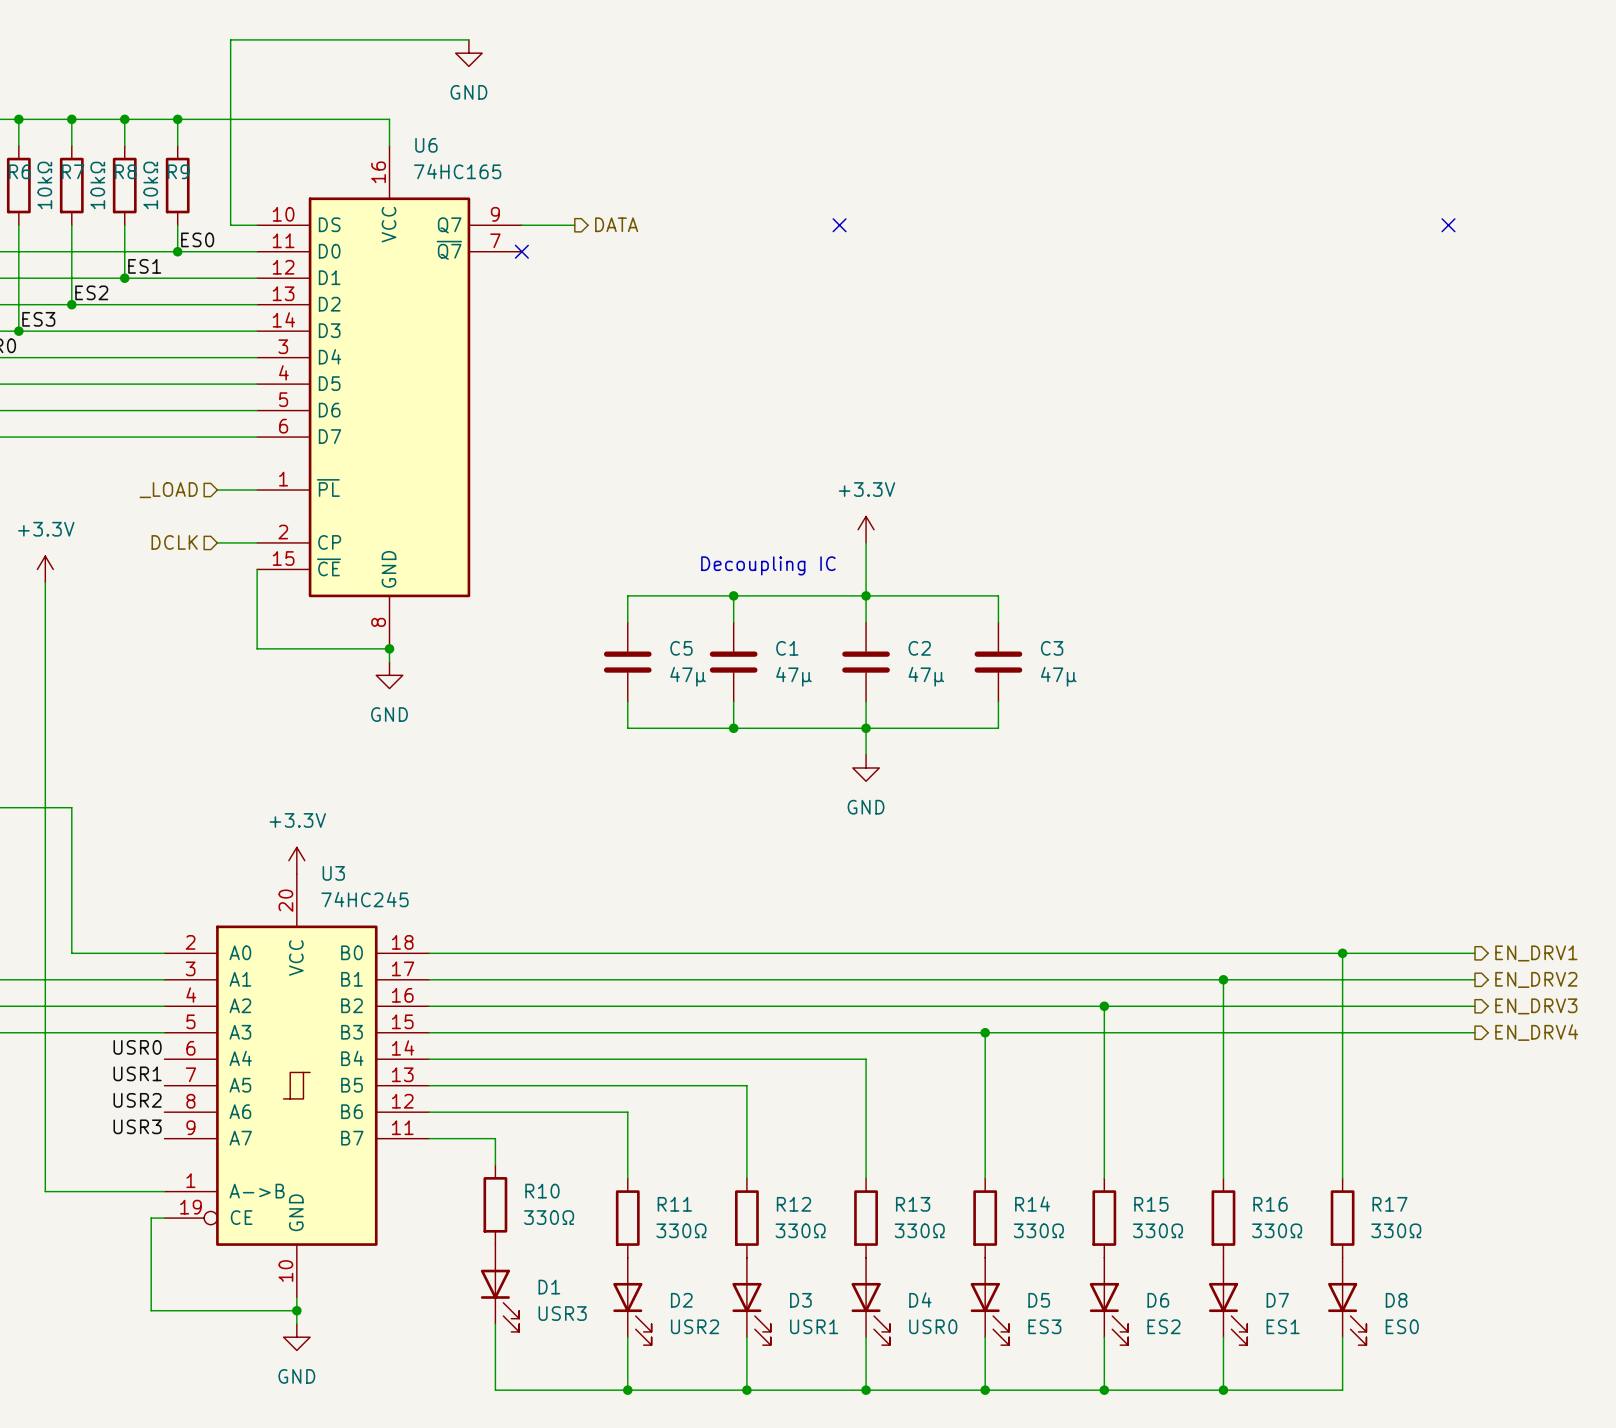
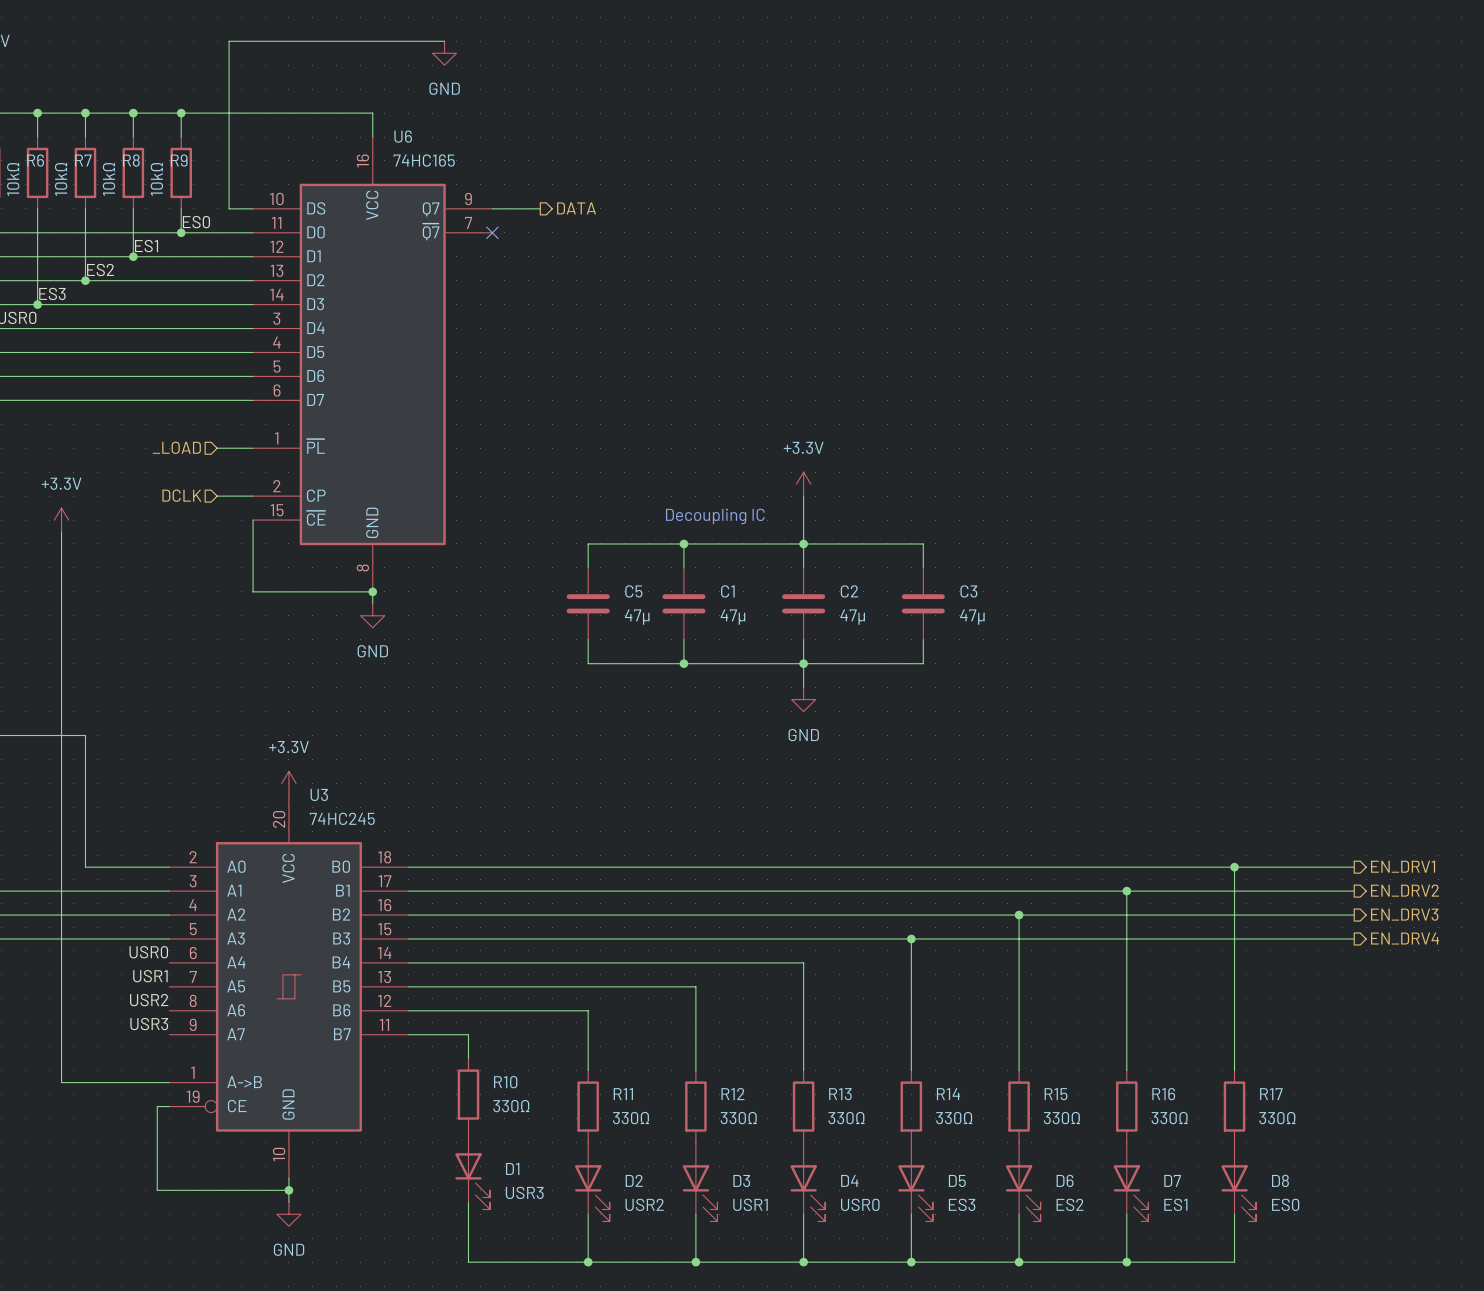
no-connect mark: (839, 225) -> none
no-connect mark: (1448, 225) -> none

